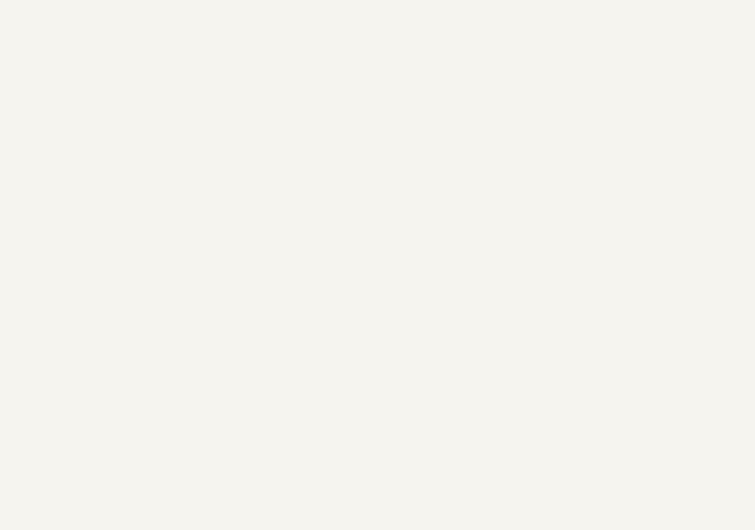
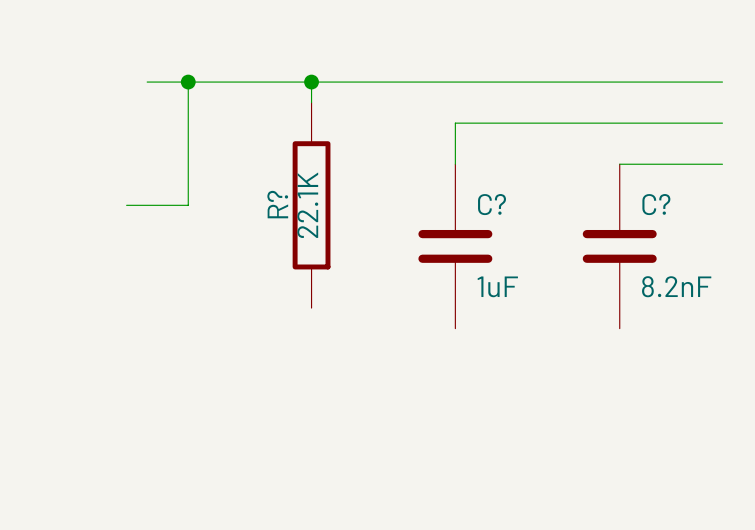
wire: none -> (147, 82) (722, 82)
wire: none -> (188, 82) (188, 205) (126, 205)
junction: none -> (188, 82)
wire: none -> (311, 82) (311, 102)
junction: none -> (311, 82)
wire: none -> (722, 123) (455, 123) (455, 164)
wire: none -> (619, 164) (722, 164)
R?: none -> 22.1K (311, 205)
C?: none -> 1uF (455, 246)
C?: none -> 8.2nF (619, 246)

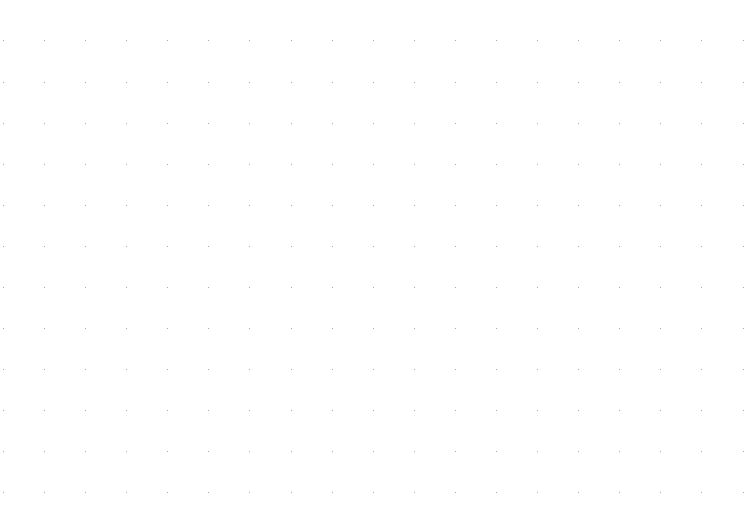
wire: (147, 82) (722, 82) -> none
wire: (188, 82) (188, 205) (126, 205) -> none
junction: (188, 82) -> none
wire: (311, 82) (311, 102) -> none
junction: (311, 82) -> none
wire: (722, 123) (455, 123) (455, 164) -> none
wire: (619, 164) (722, 164) -> none
R?: 22.1K (311, 205) -> none
C?: 1uF (455, 246) -> none
C?: 8.2nF (619, 246) -> none

